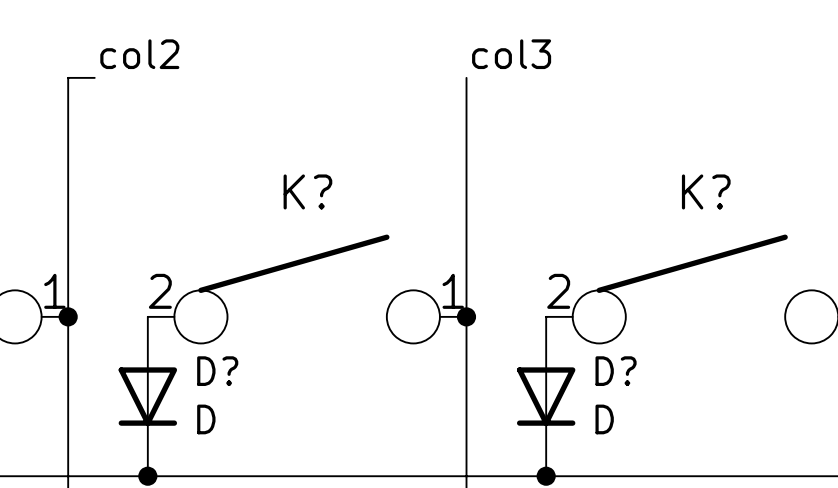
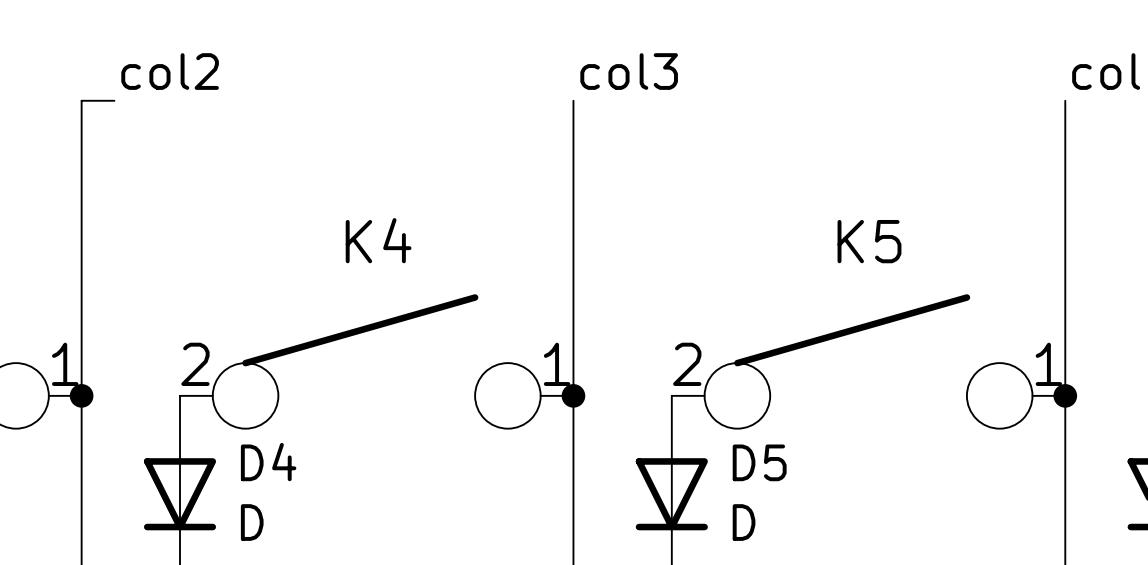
K? name: K? (307, 191) -> K4 (378, 240)
K? name: K? (706, 191) -> K5 (869, 241)
D? name: D? (217, 371) -> D4 (268, 462)
D? name: D? (616, 371) -> D5 (759, 462)

